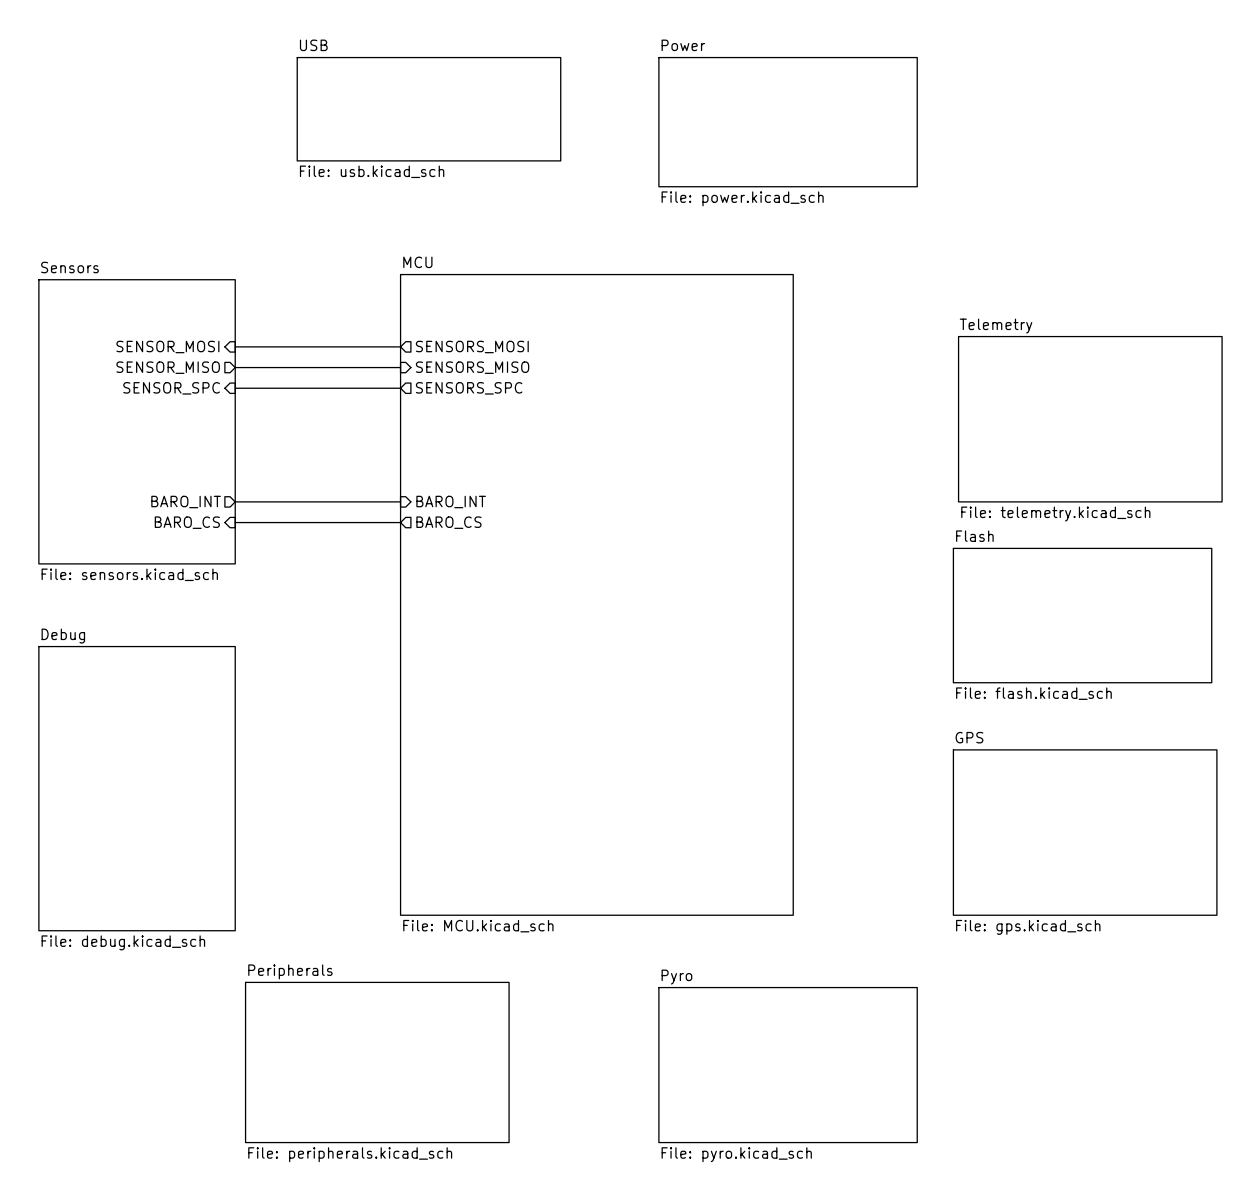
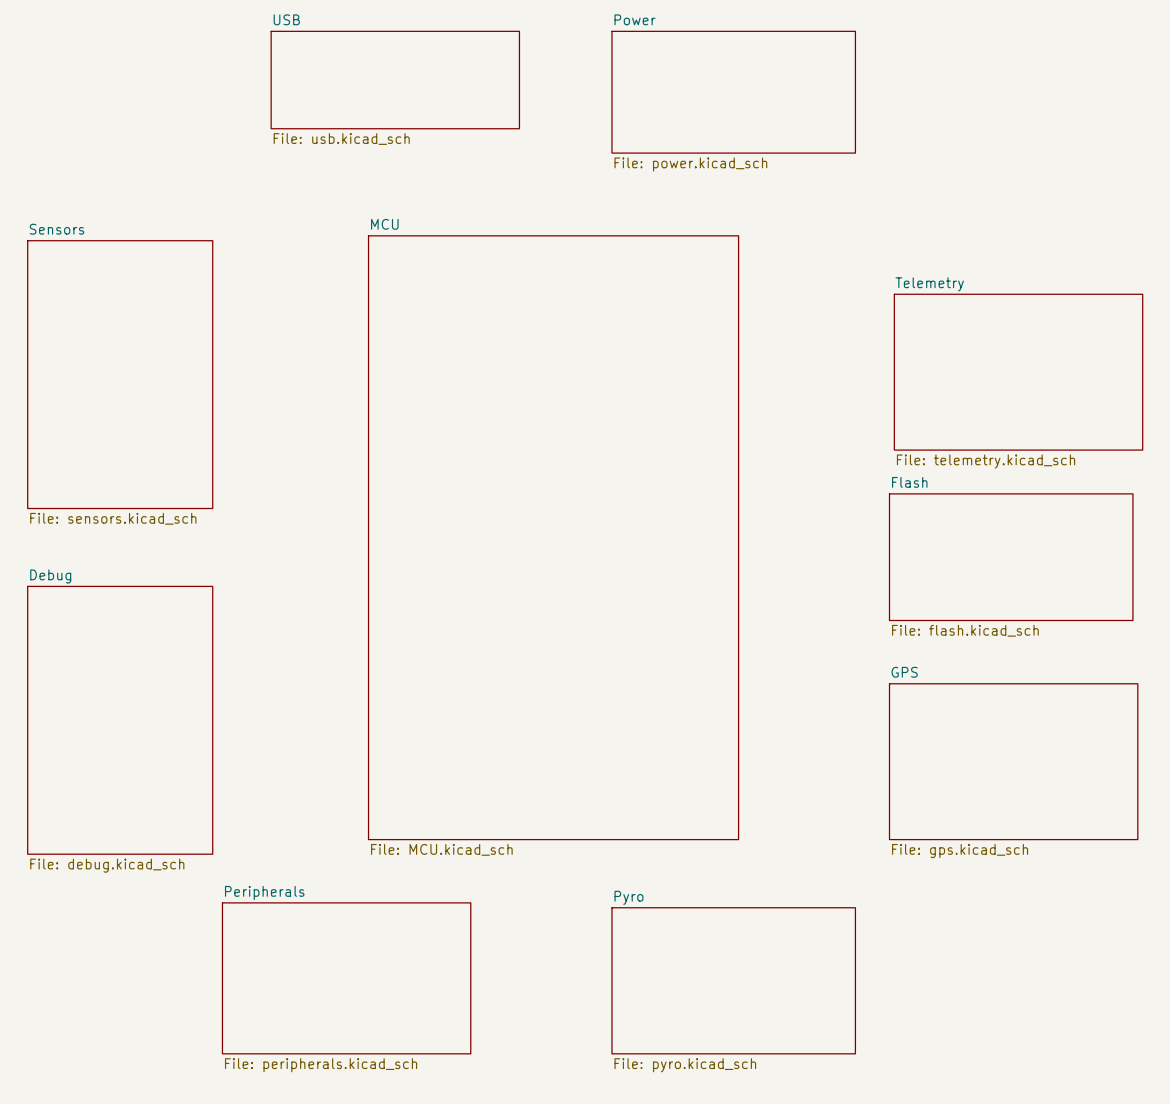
wire: (235, 346) (400, 346) -> none
sheet pin: SENSOR_MOSI (167, 347) -> none
sheet pin: SENSORS_MOSI (472, 347) -> none
sheet pin: SENSOR_MISO (168, 367) -> none
wire: (235, 367) (400, 367) -> none
sheet pin: SENSORS_MISO (472, 367) -> none
sheet pin: SENSOR_SPC (171, 388) -> none
wire: (235, 388) (400, 388) -> none
sheet pin: SENSORS_SPC (469, 388) -> none
wire: (235, 501) (400, 501) -> none
sheet pin: BARO_INT (186, 502) -> none
sheet pin: BARO_INT (451, 502) -> none
sheet pin: BARO_CS (187, 522) -> none
wire: (235, 522) (400, 522) -> none
sheet pin: BARO_CS (448, 522) -> none

